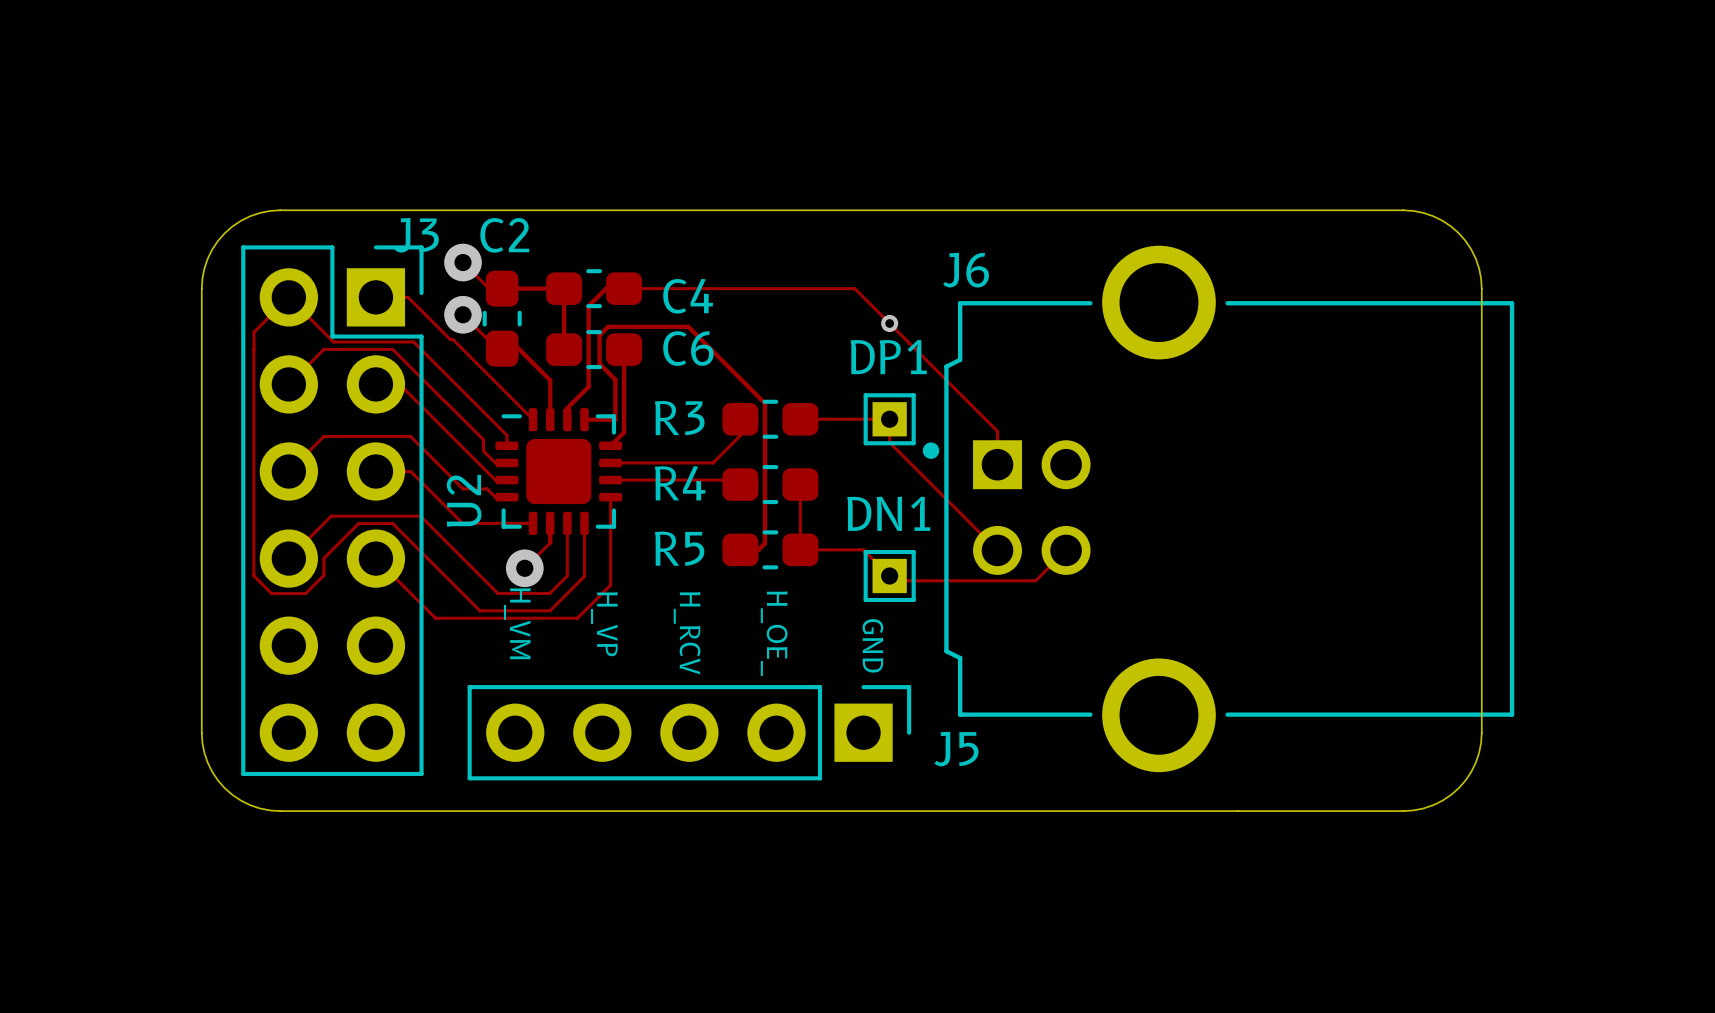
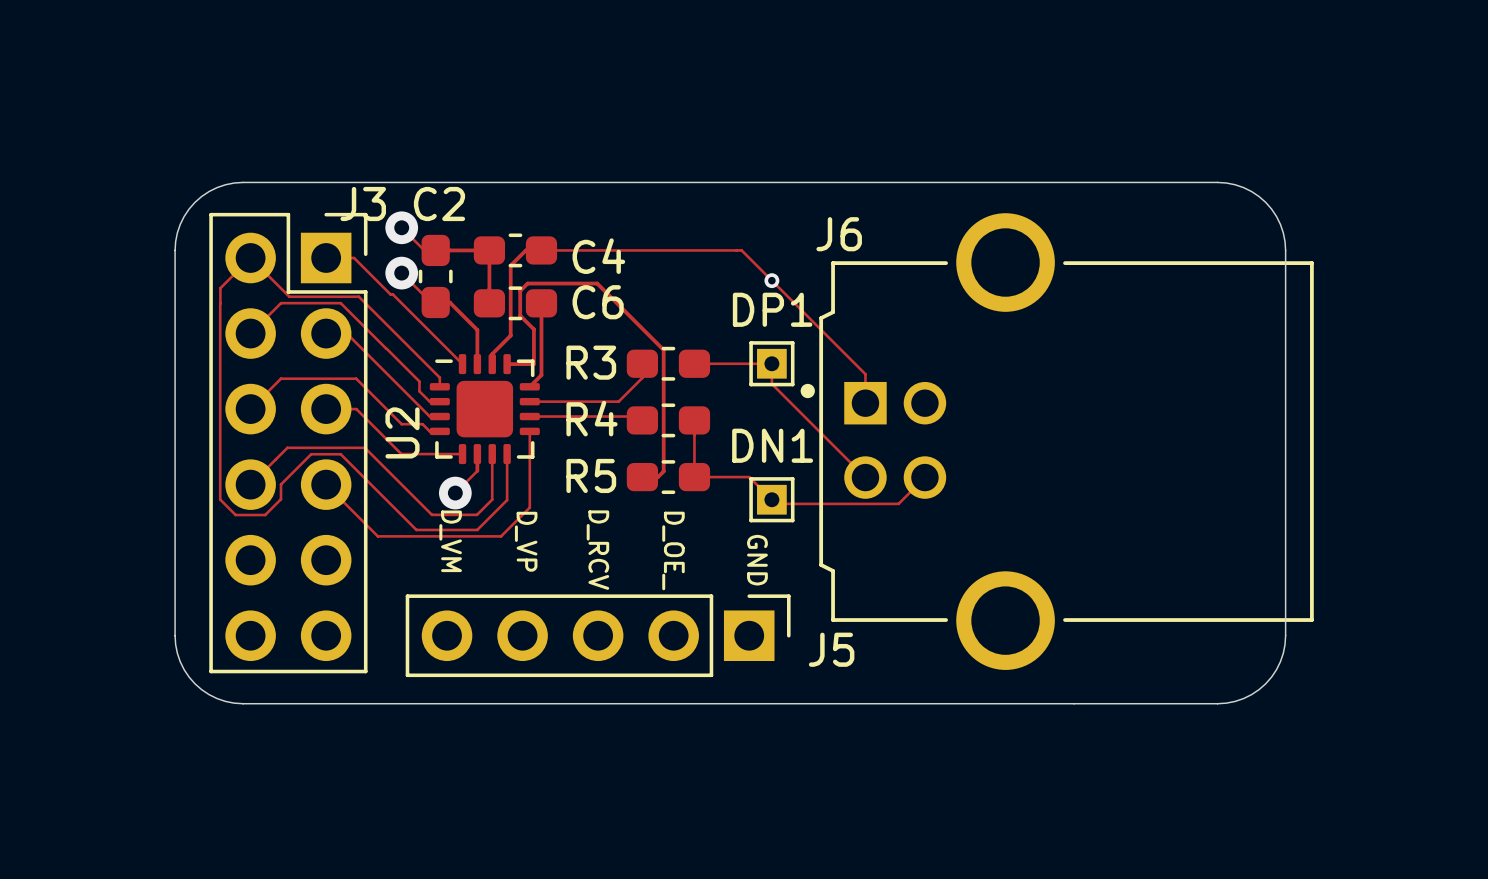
text: H_VM (517, 623) -> D_VM (450, 541)
text: H_VP (604, 624) -> D_VP (526, 541)
text: H_RCV (687, 633) -> D_RCV (597, 550)
text: H_OE_ (774, 633) -> D_OE_ (673, 550)

